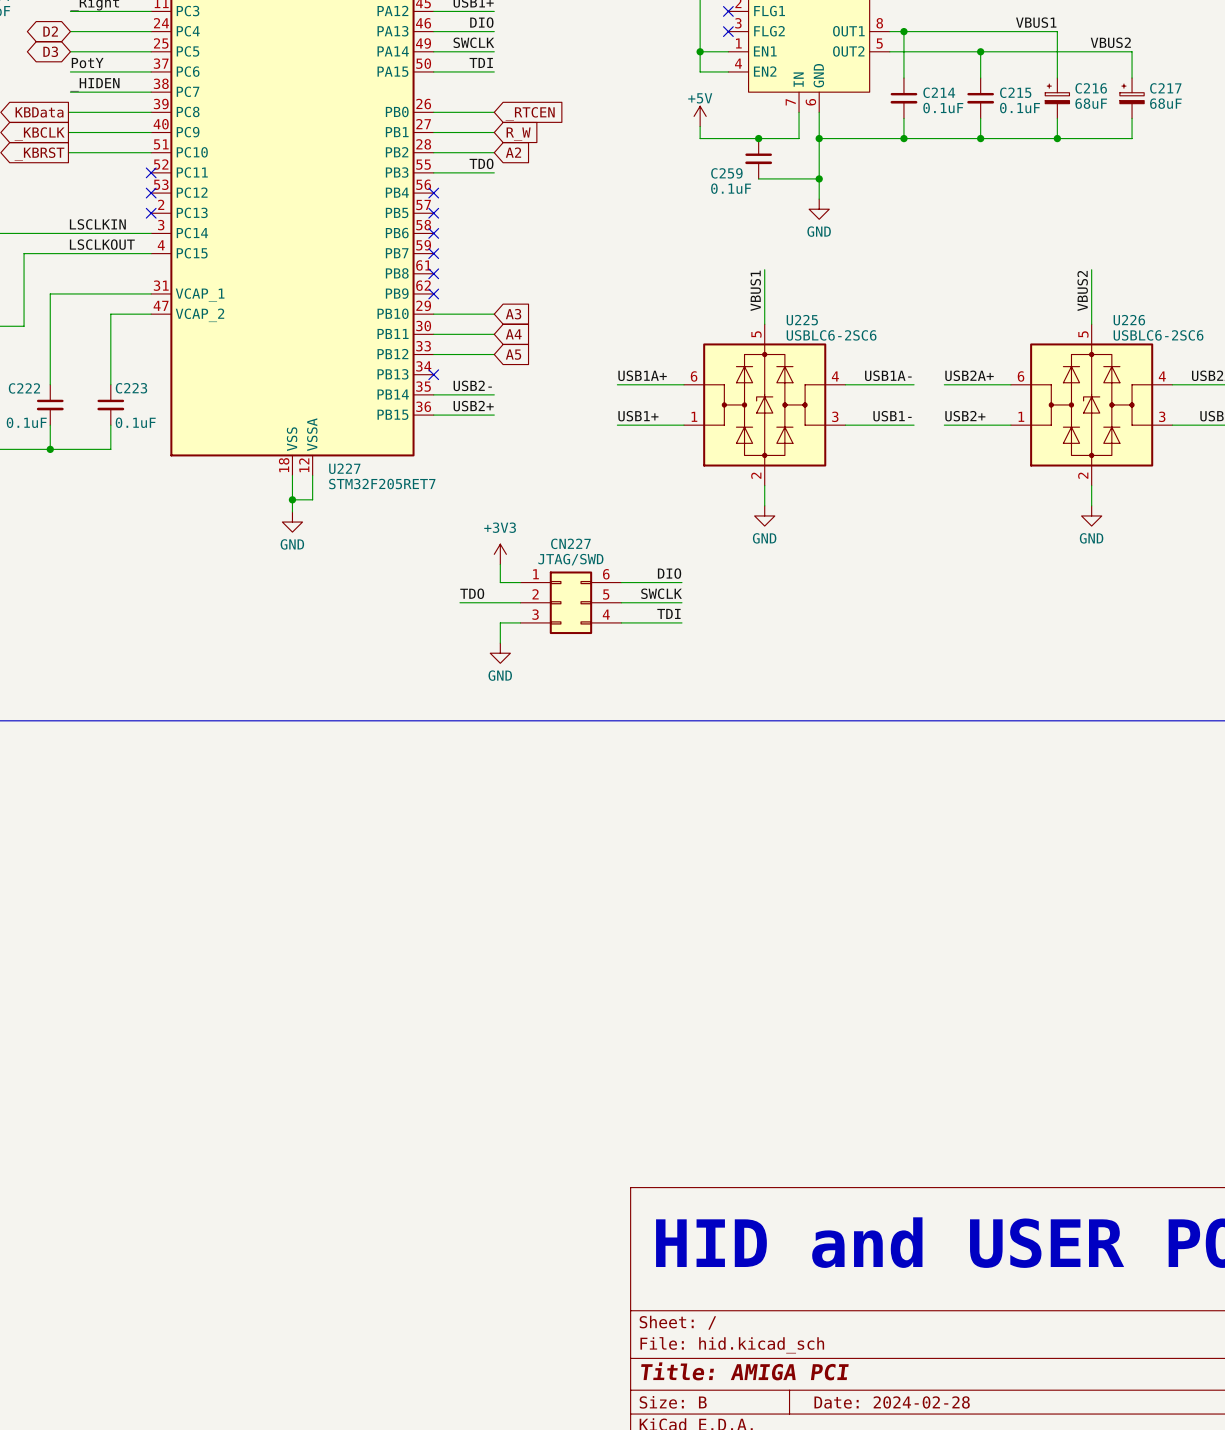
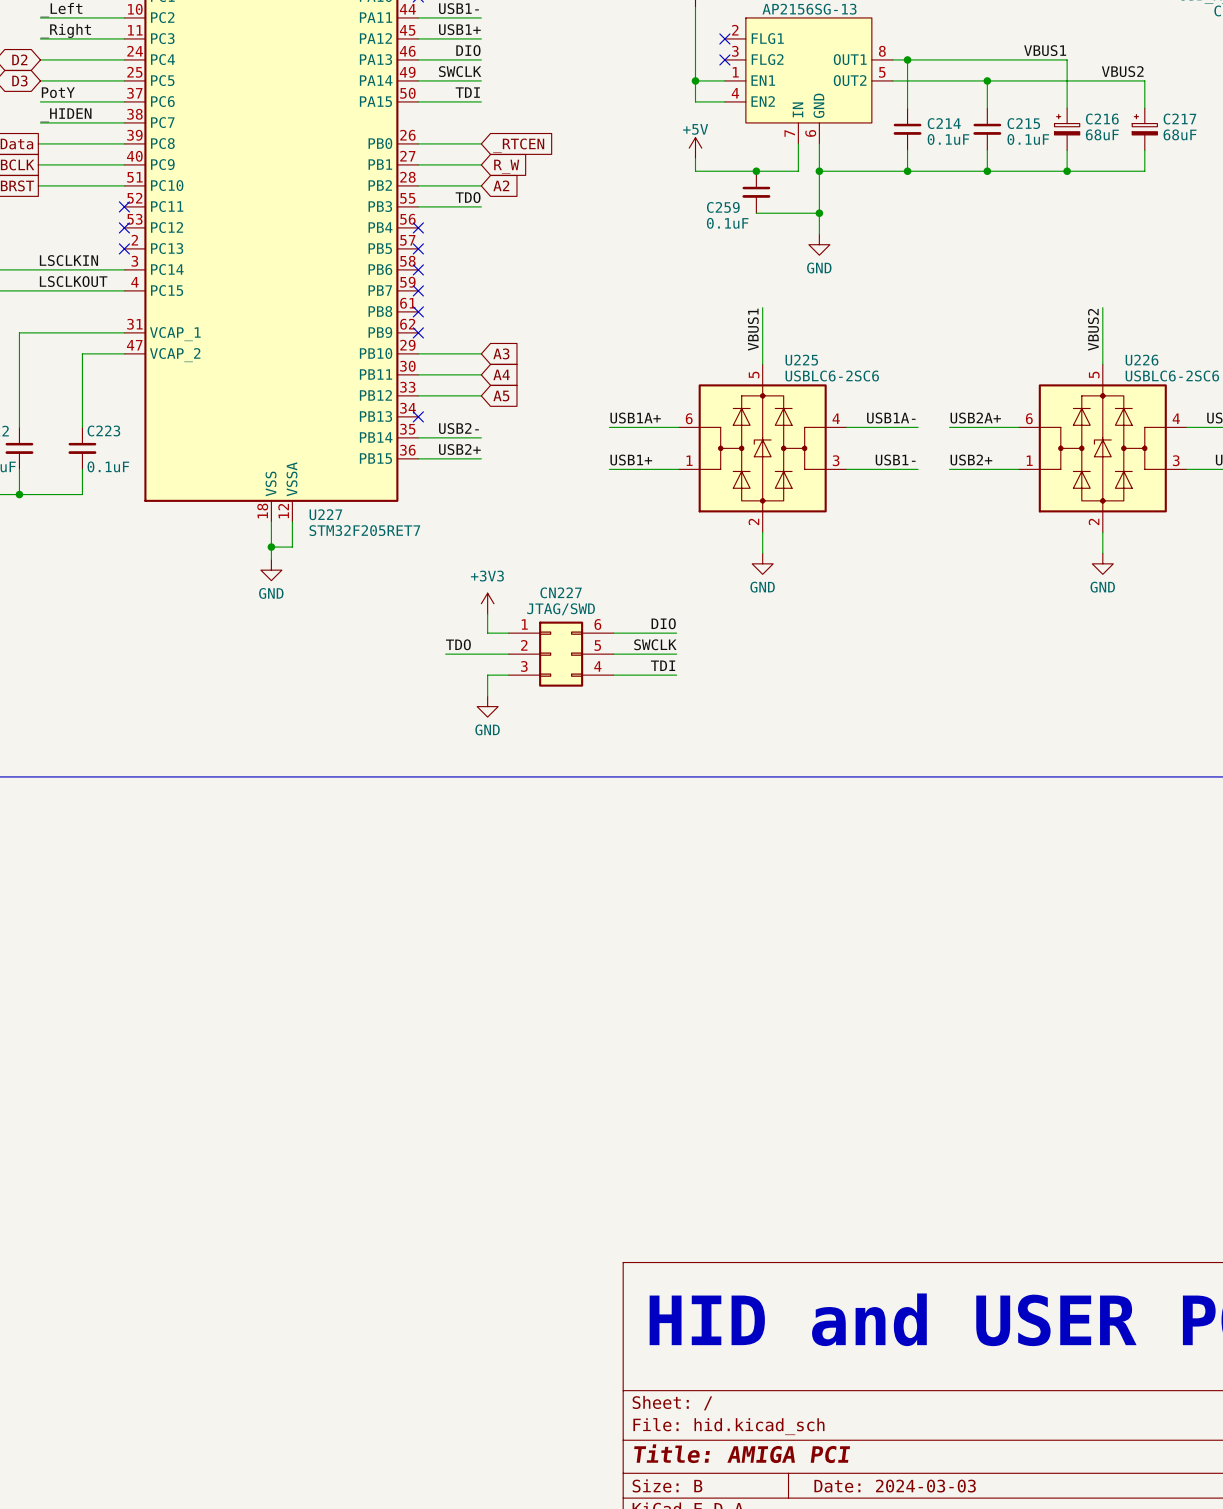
title block: Date: 2024-02-28 (892, 1402) -> Date: 2024-03-03 (895, 1486)

